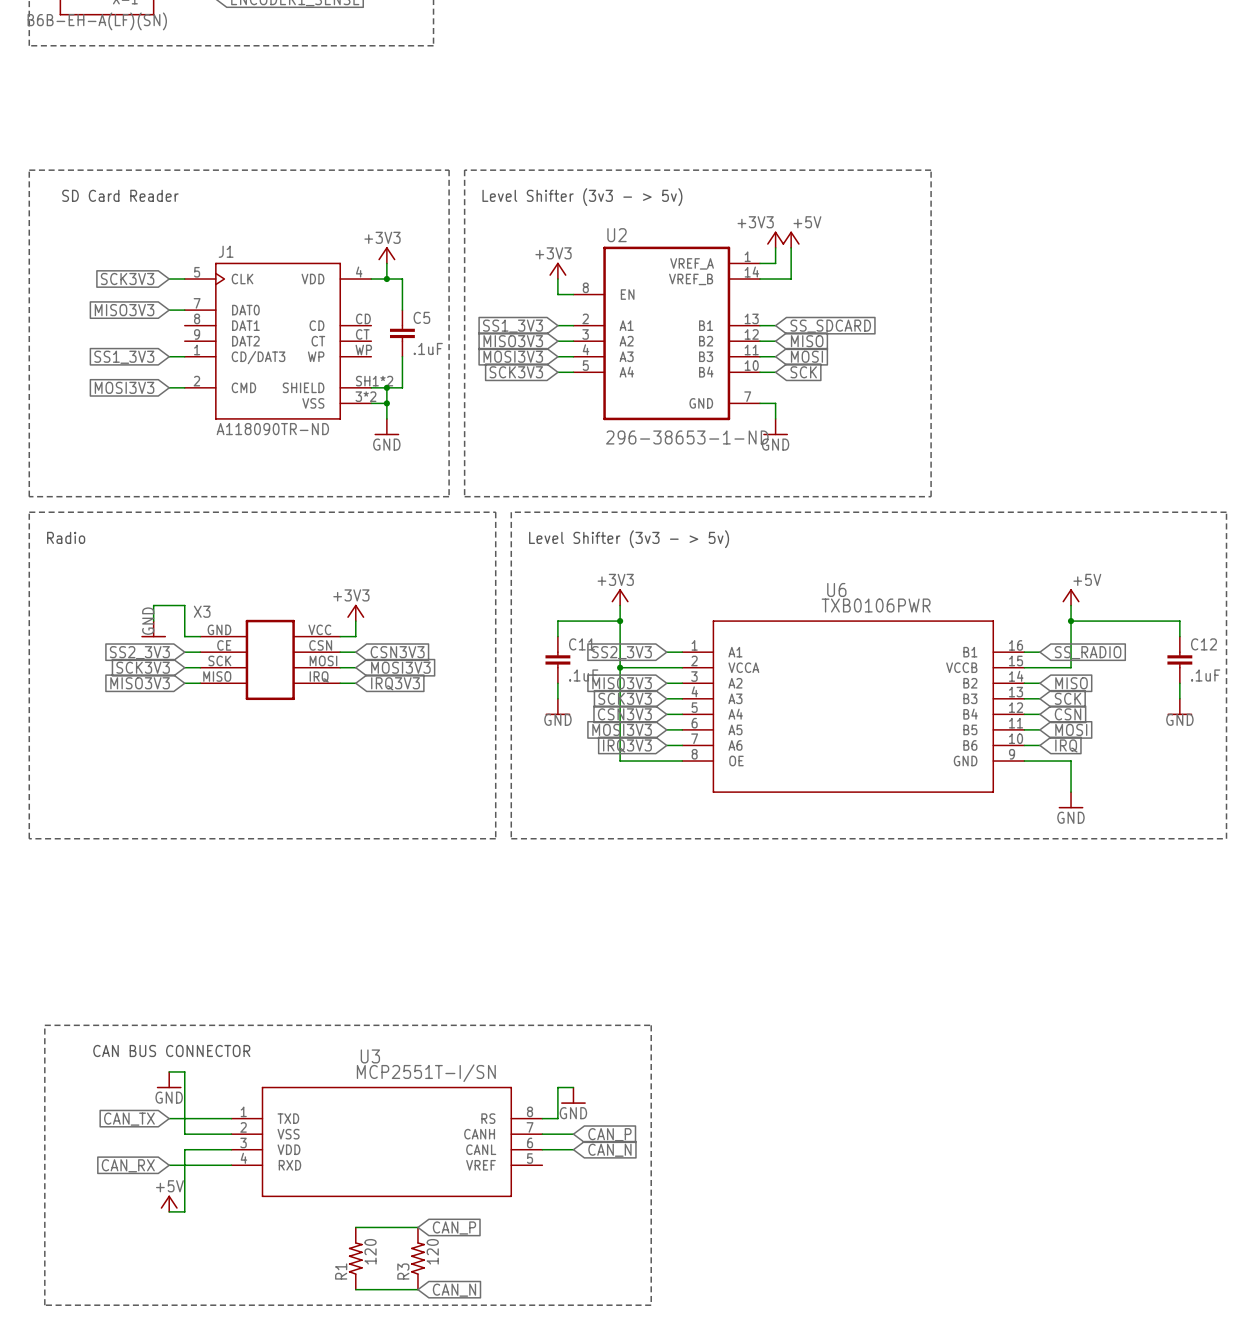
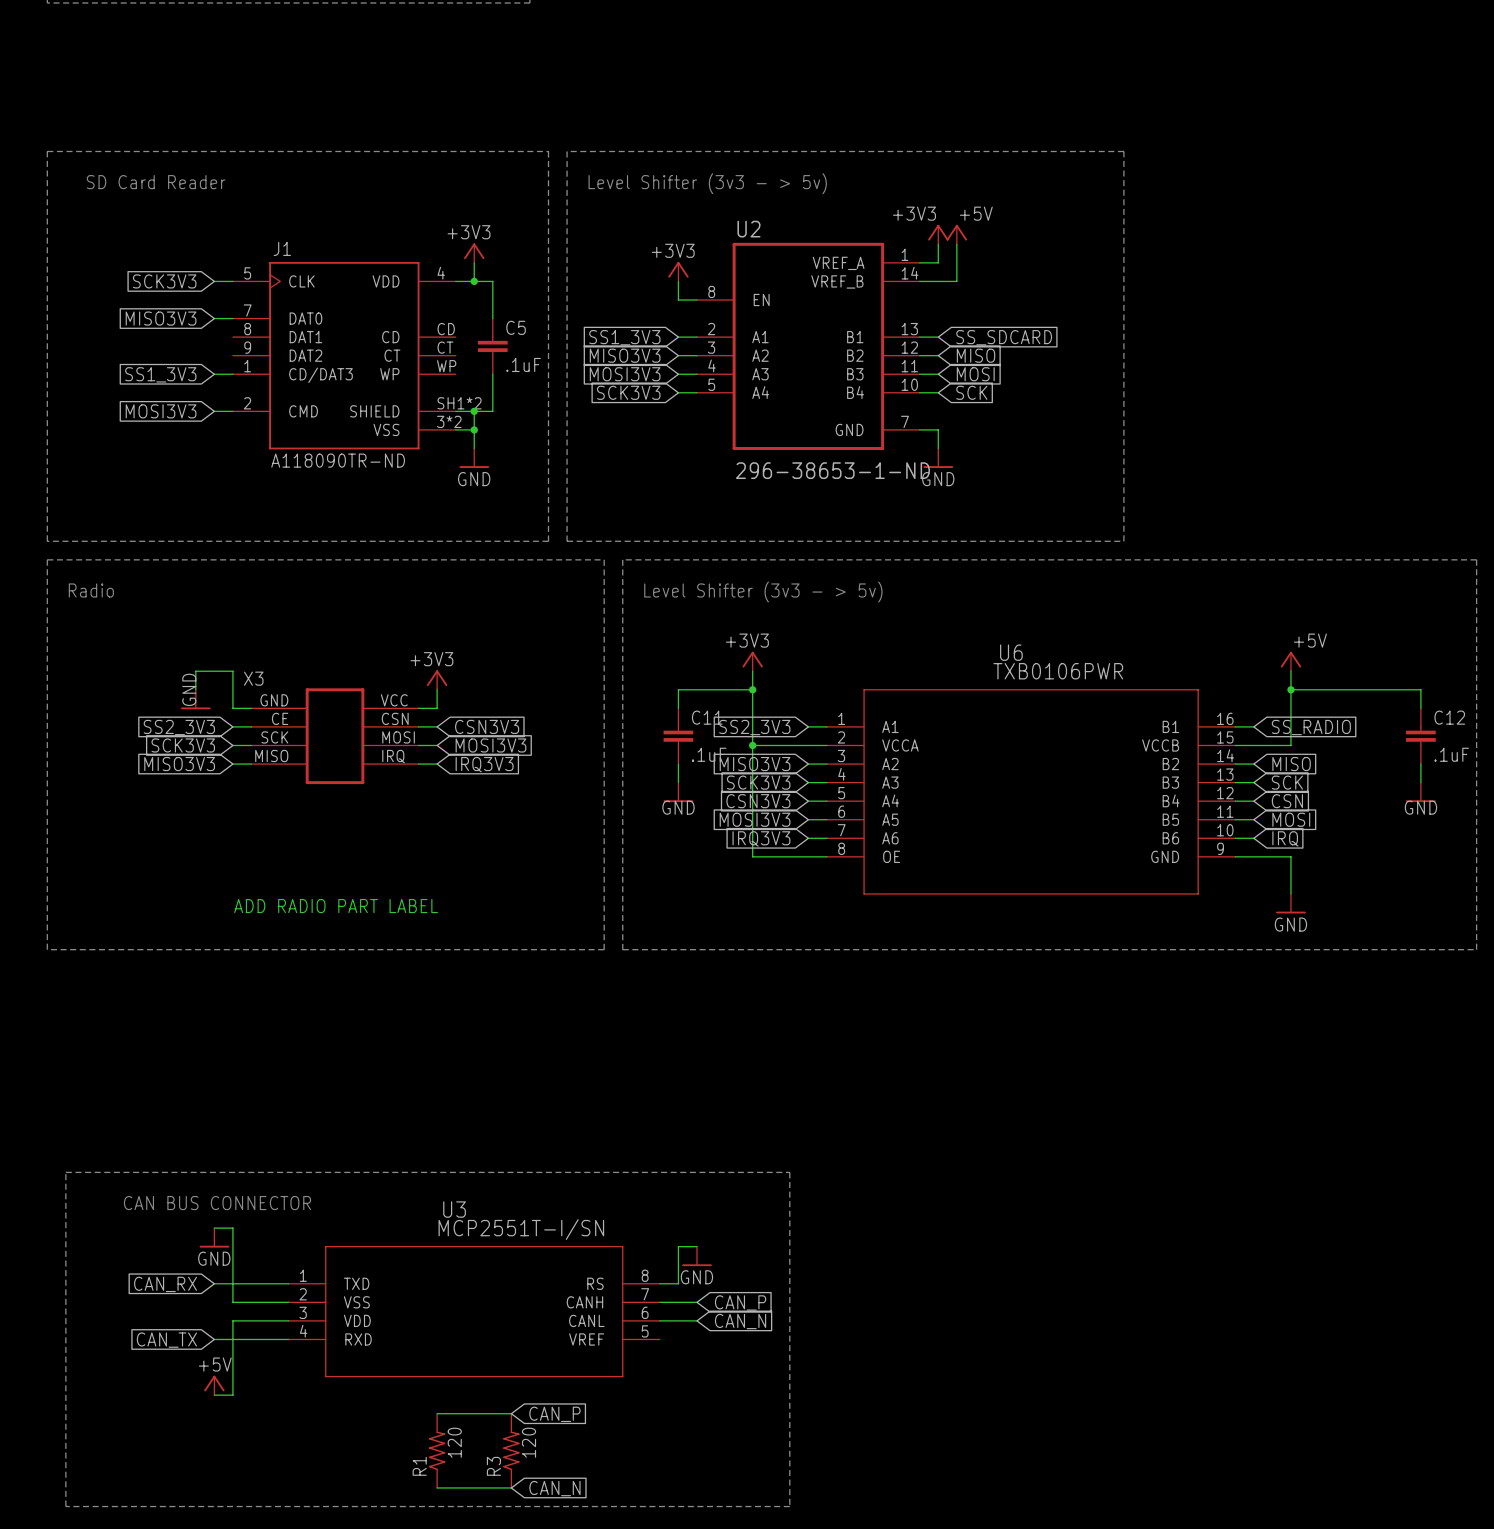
text: none -> ADD RADIO PART LABEL (336, 906)
global label: CAN_TX (129, 1119) -> CAN_RX (165, 1284)
global label: CAN_RX (128, 1165) -> CAN_TX (166, 1340)

